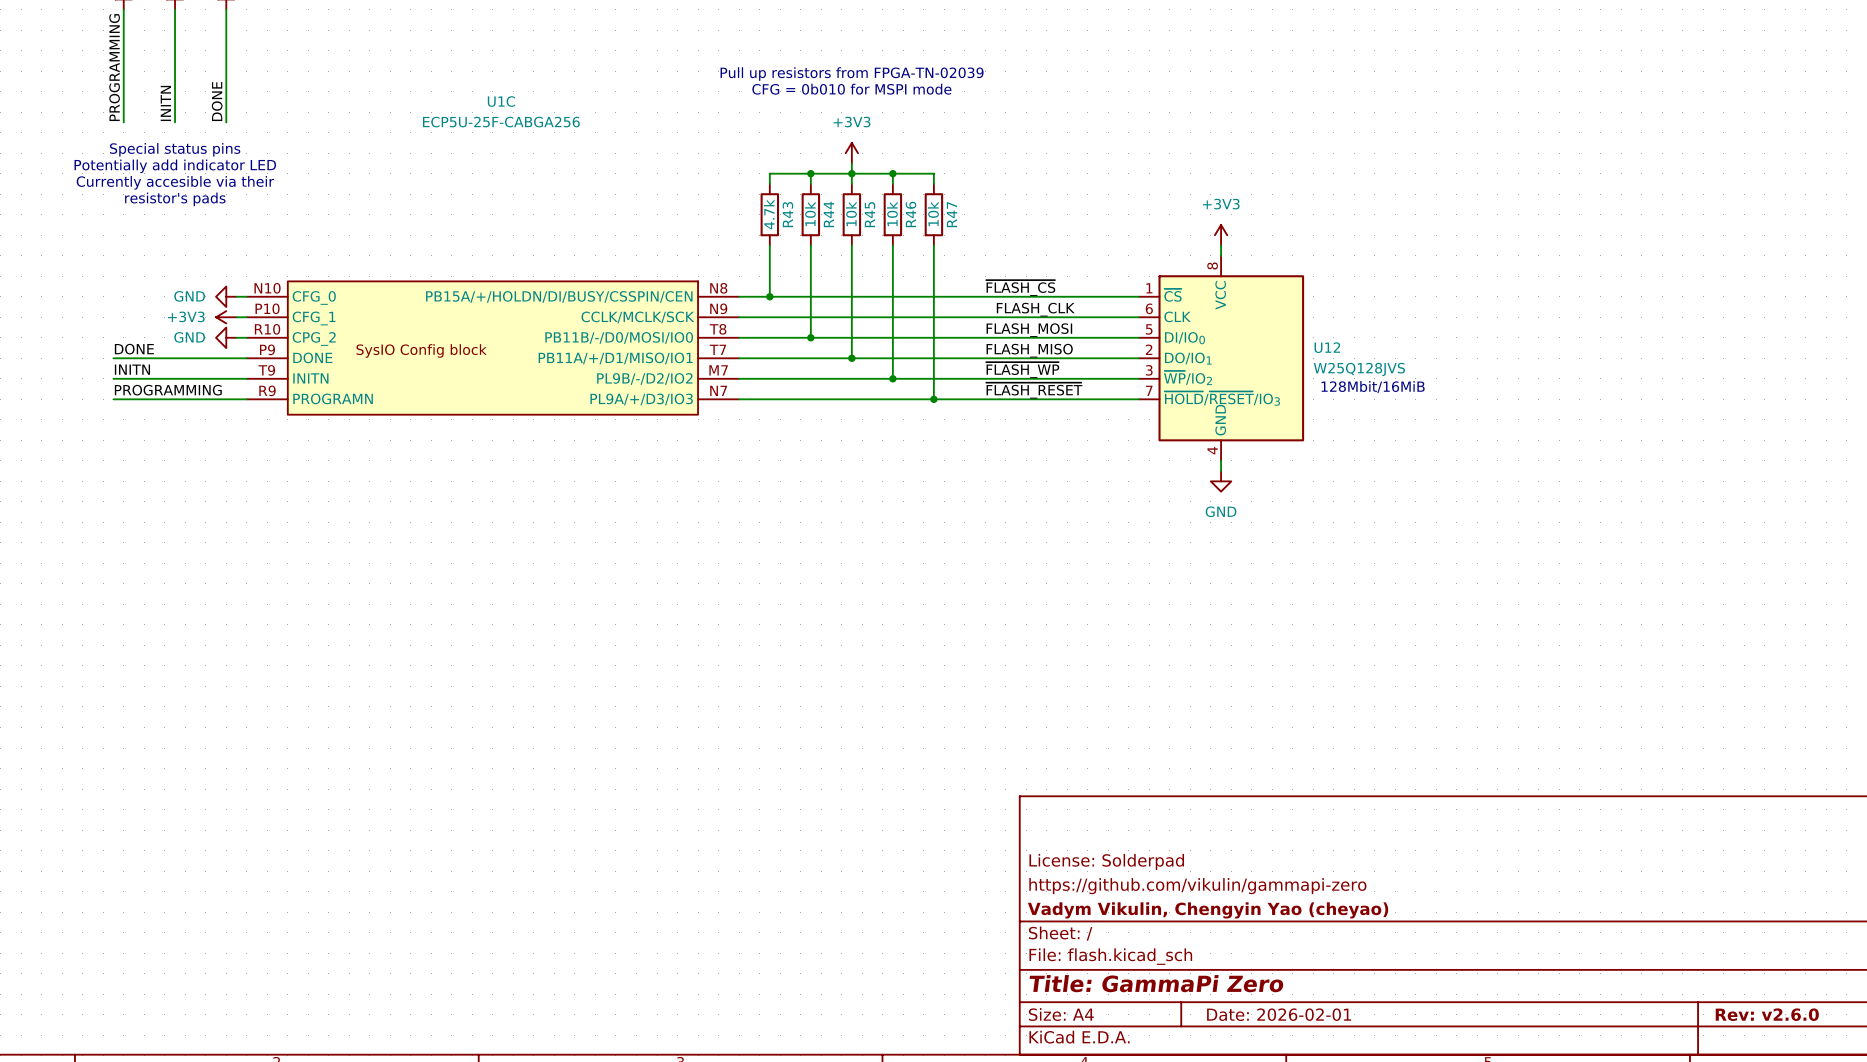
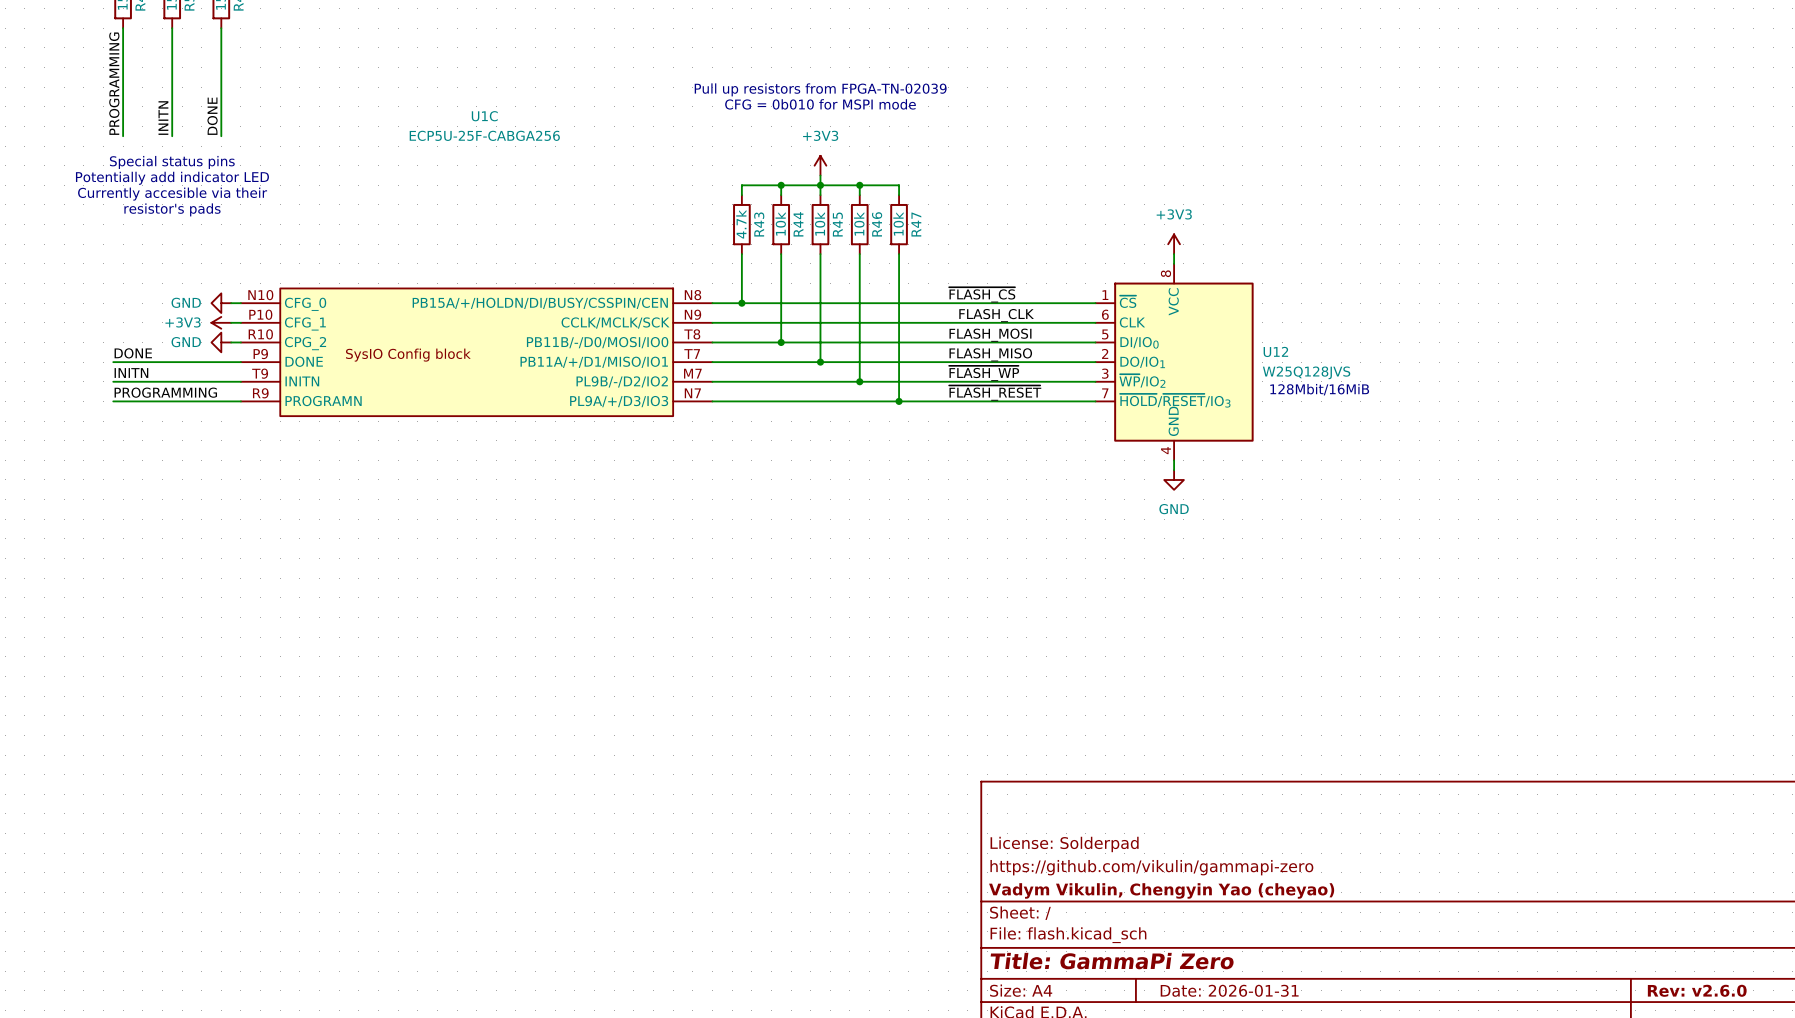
title block: Date: 2026-02-01 (1279, 1014) -> Date: 2026-01-31 (1229, 990)

